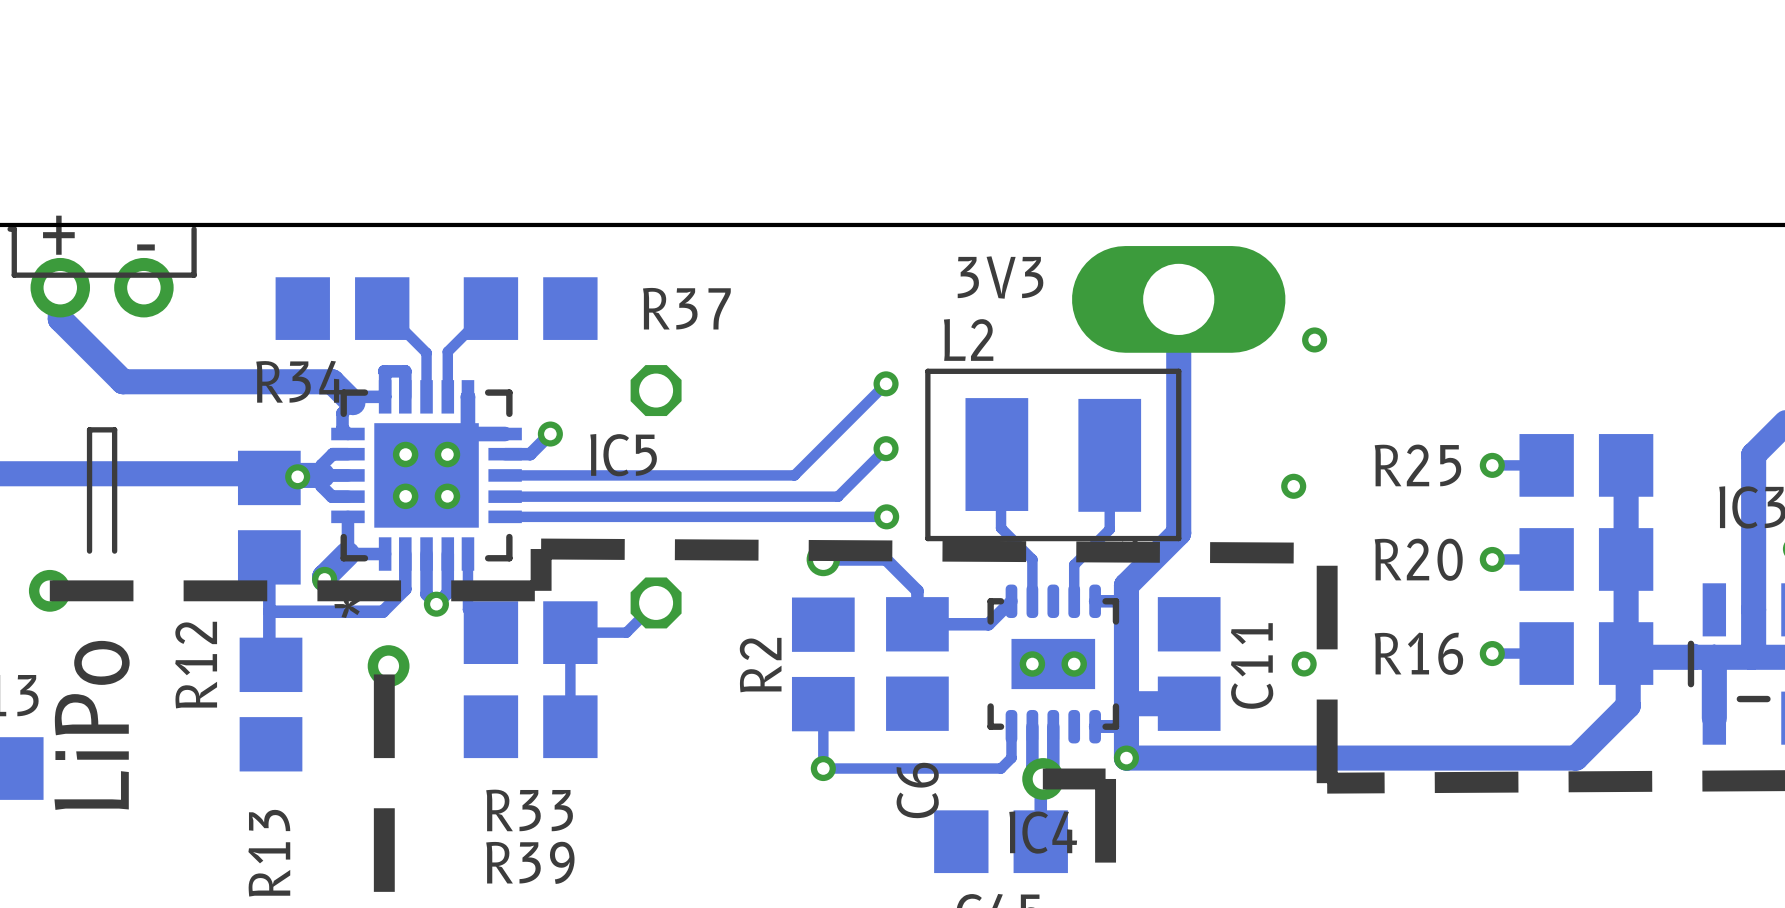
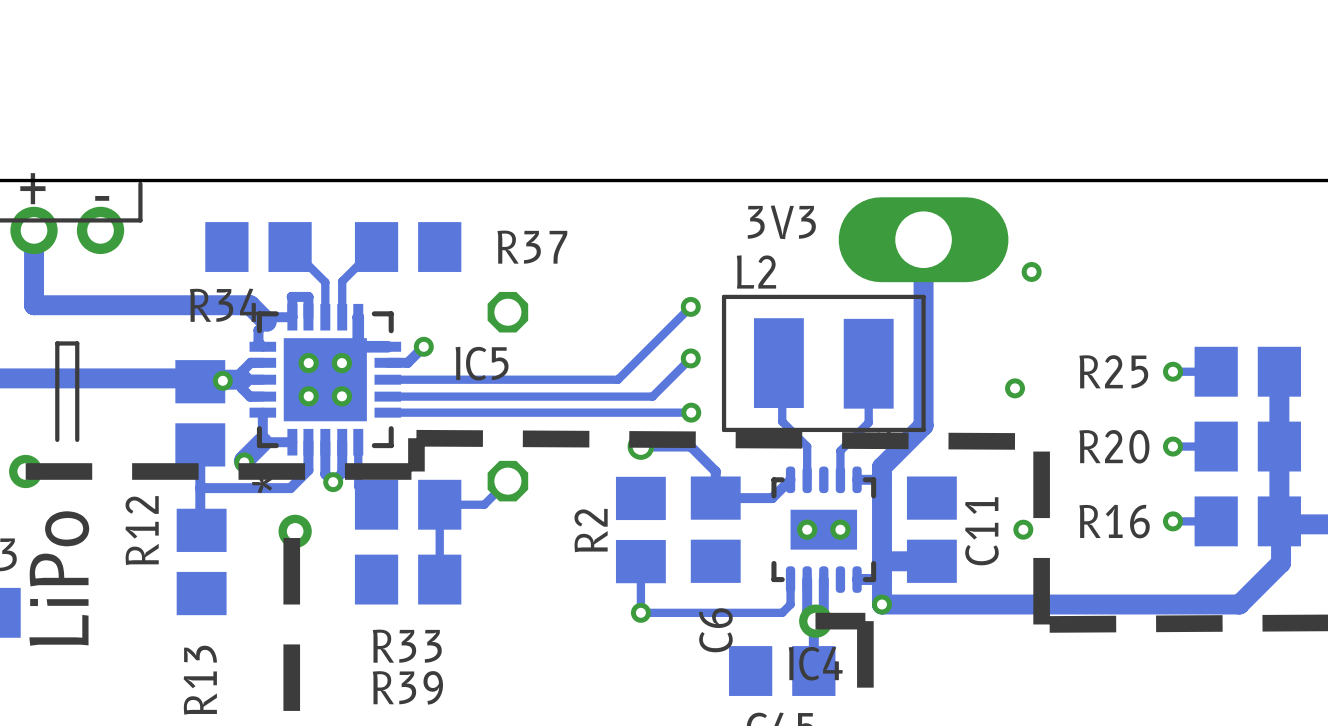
track: (60, 319) (122, 381) -> (34, 255) (34, 305) (83, 305)

